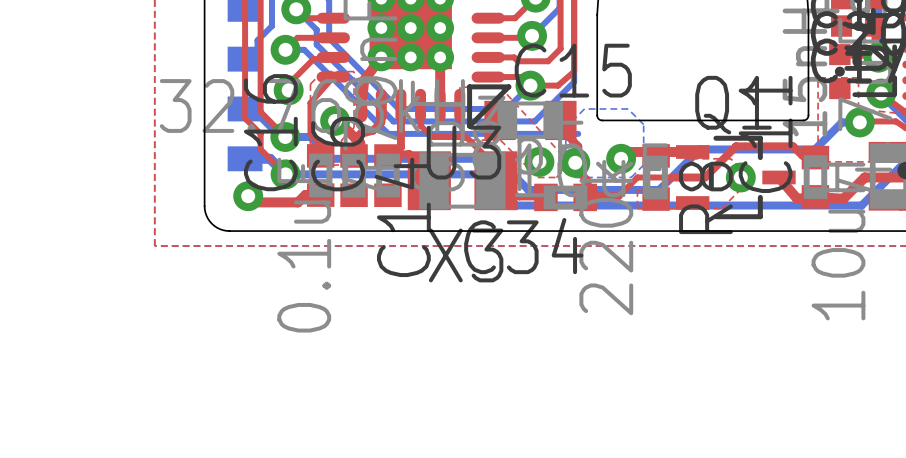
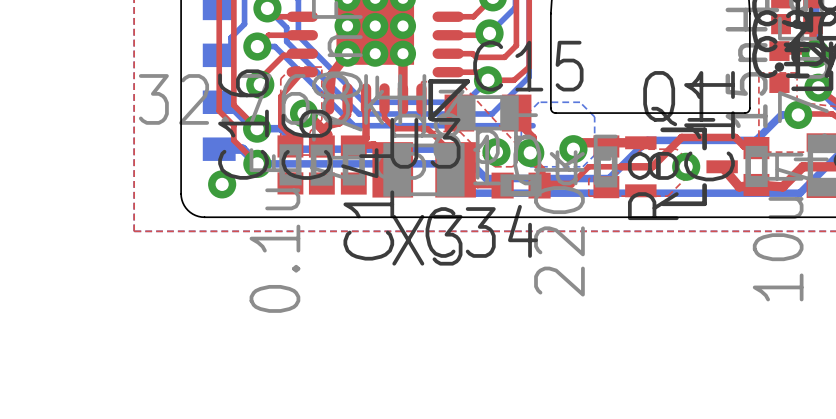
top track: (320, 195) (305, 195) (298, 202) (254, 202) (248, 196) -> none

